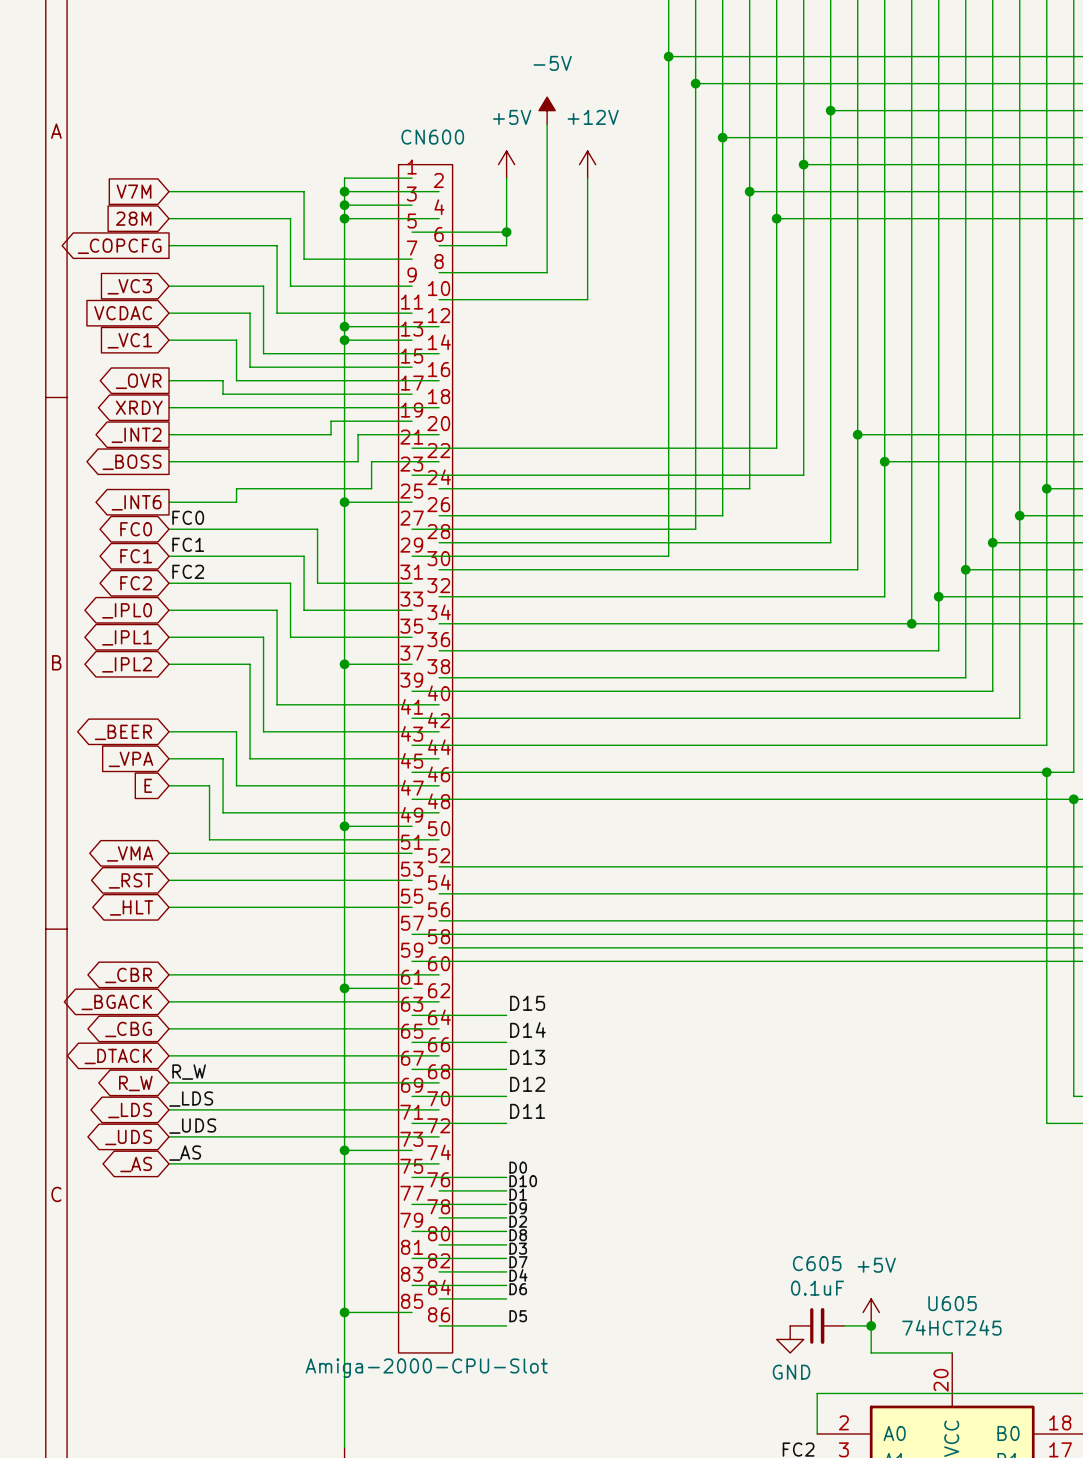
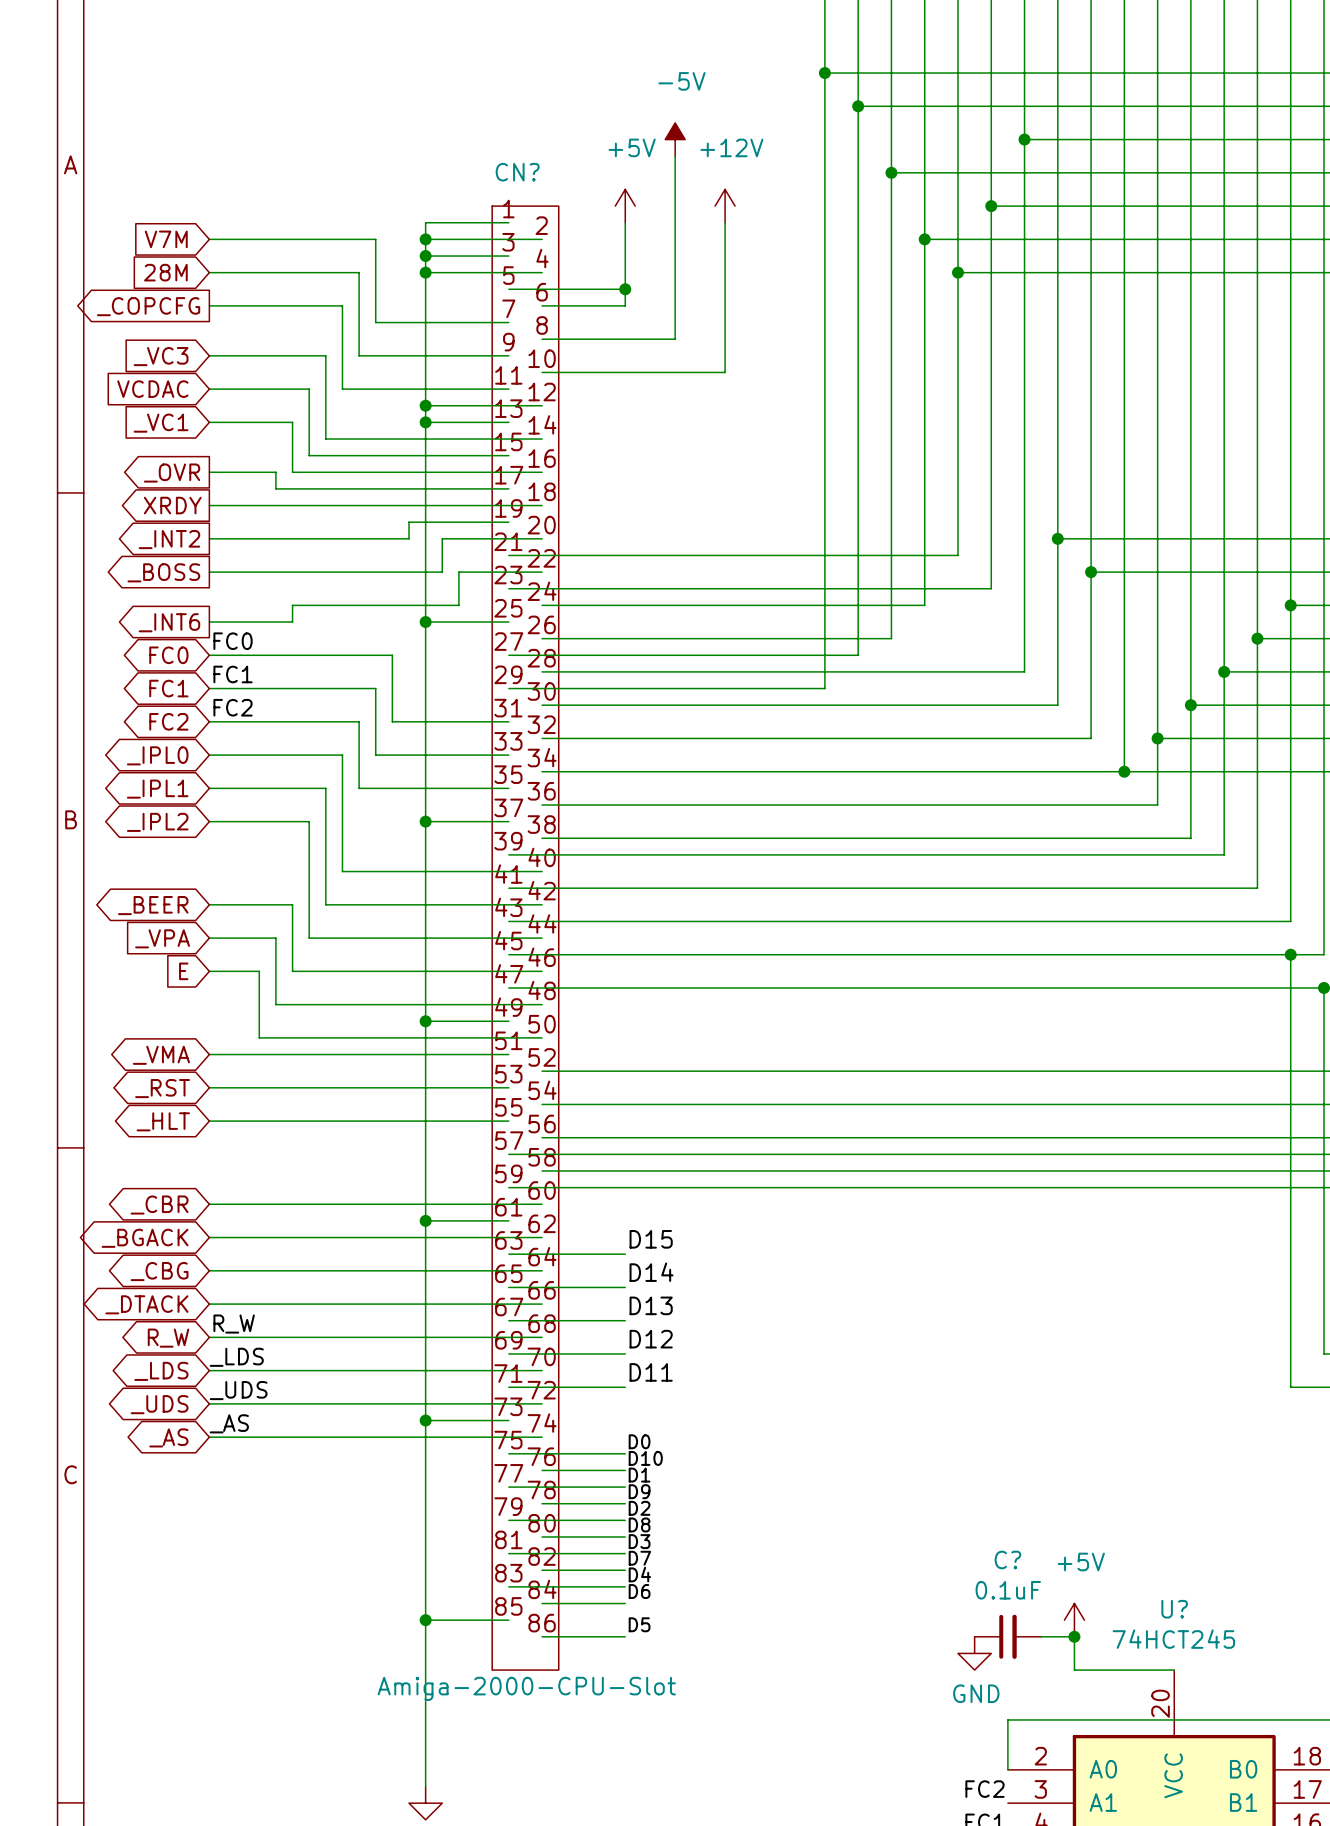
CN600 name: CN600 (432, 137) -> CN? (517, 172)
C605 name: C605 (817, 1263) -> C? (1007, 1559)
U605 name: U605 (952, 1303) -> U? (1174, 1609)

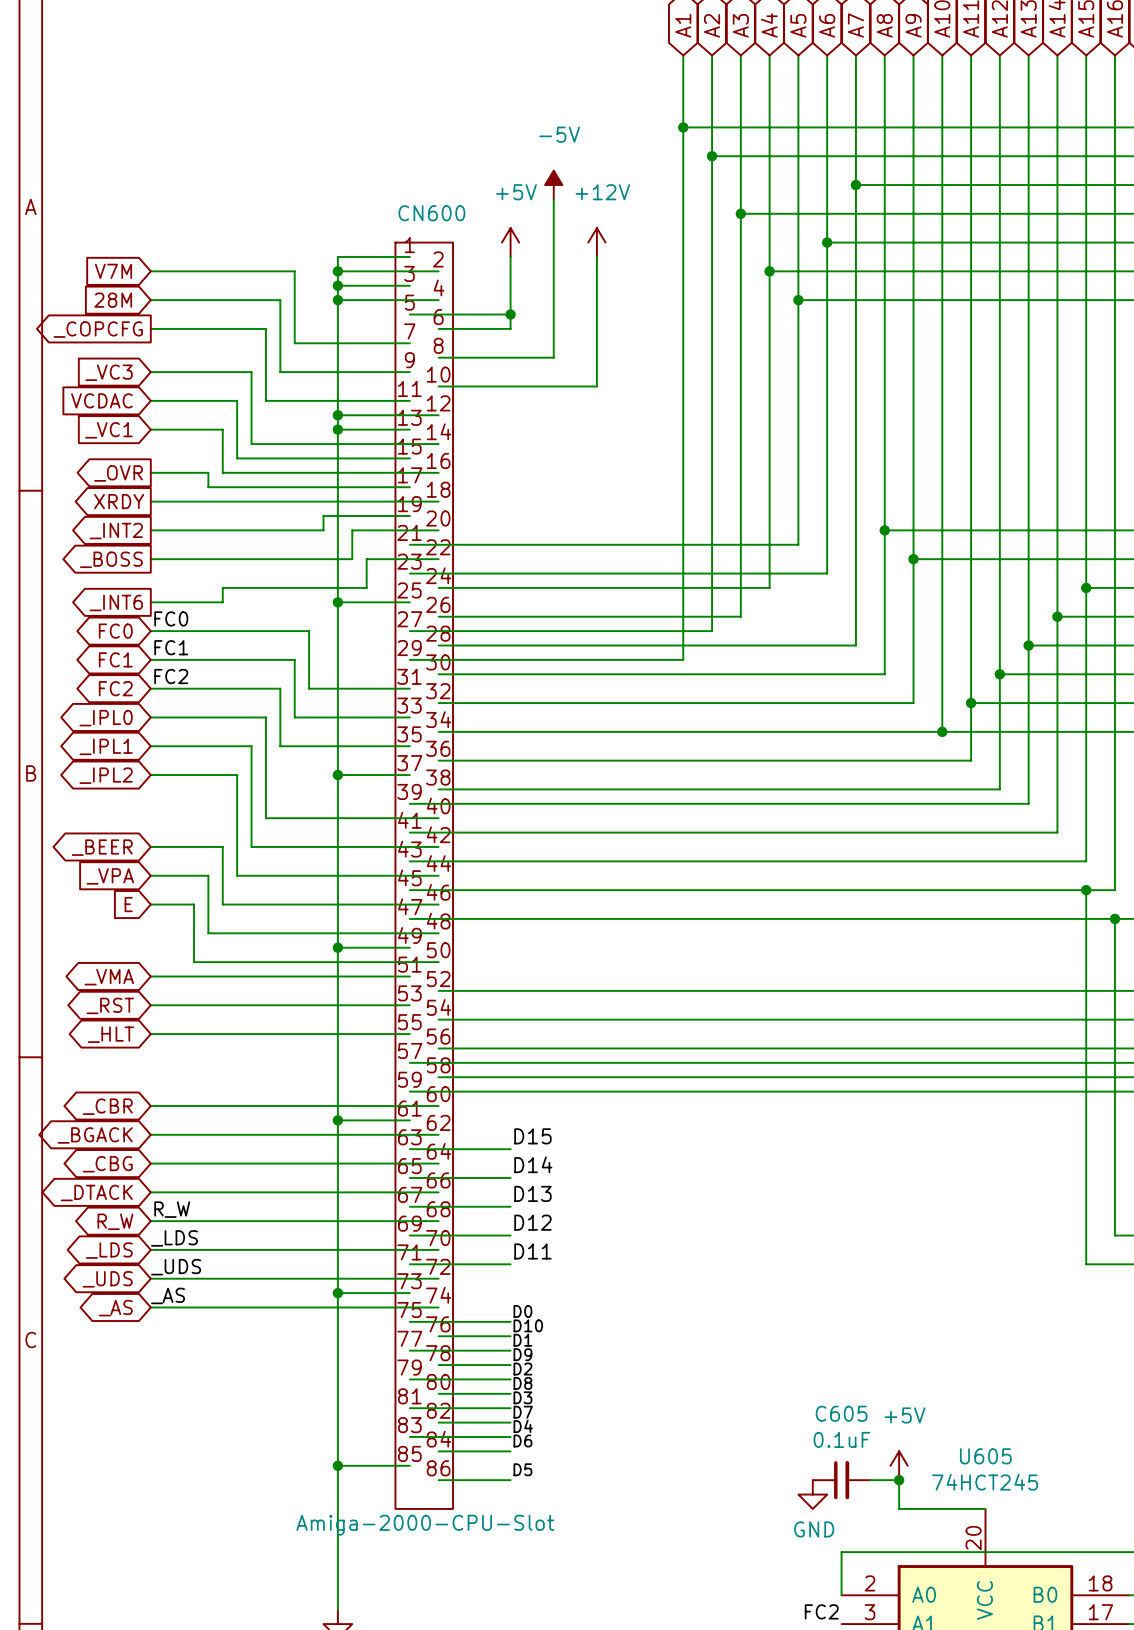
CN? name: CN? (517, 172) -> CN600 (431, 213)
C? name: C? (1007, 1559) -> C605 (841, 1413)
U? name: U? (1174, 1609) -> U605 (985, 1456)

